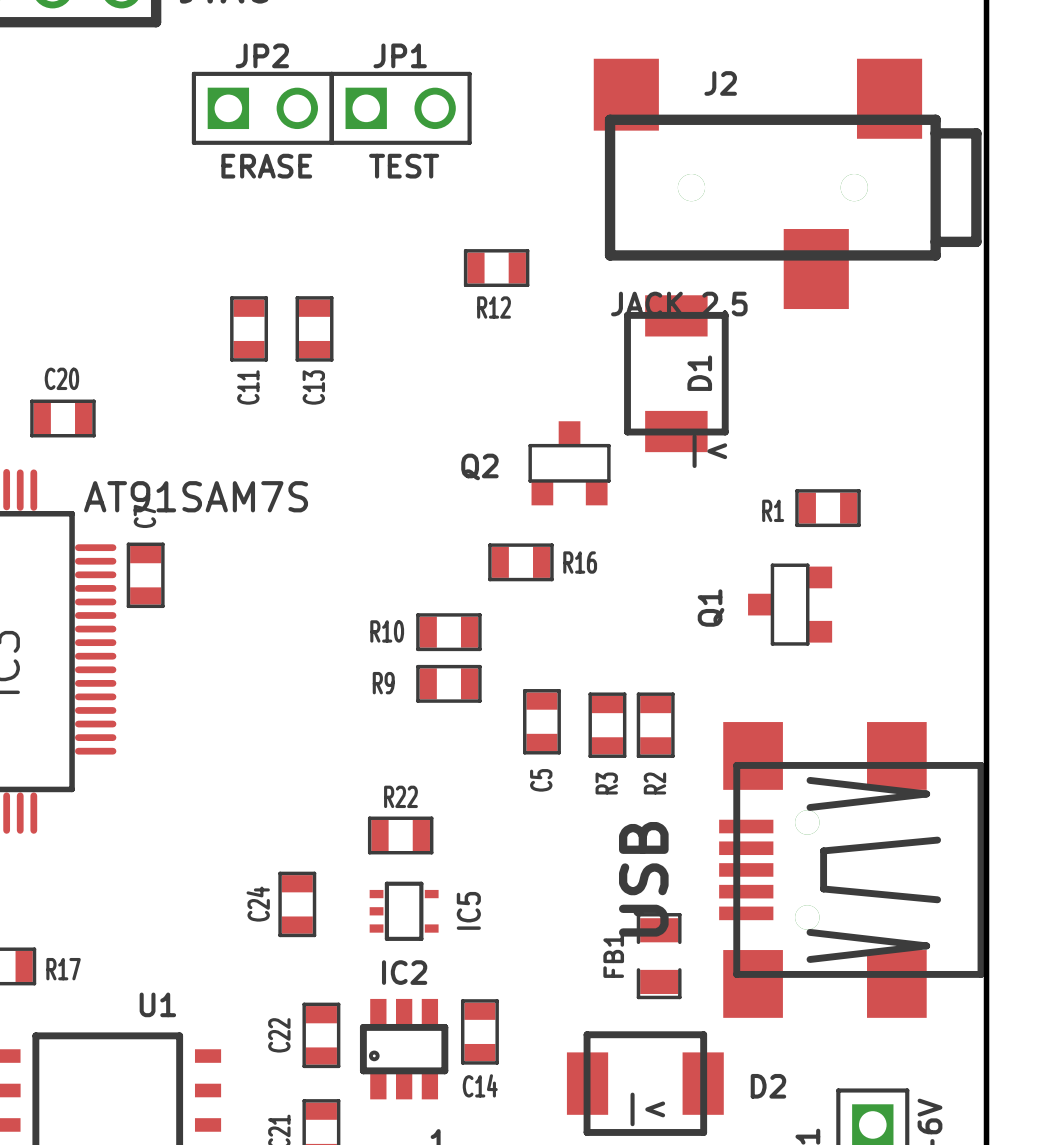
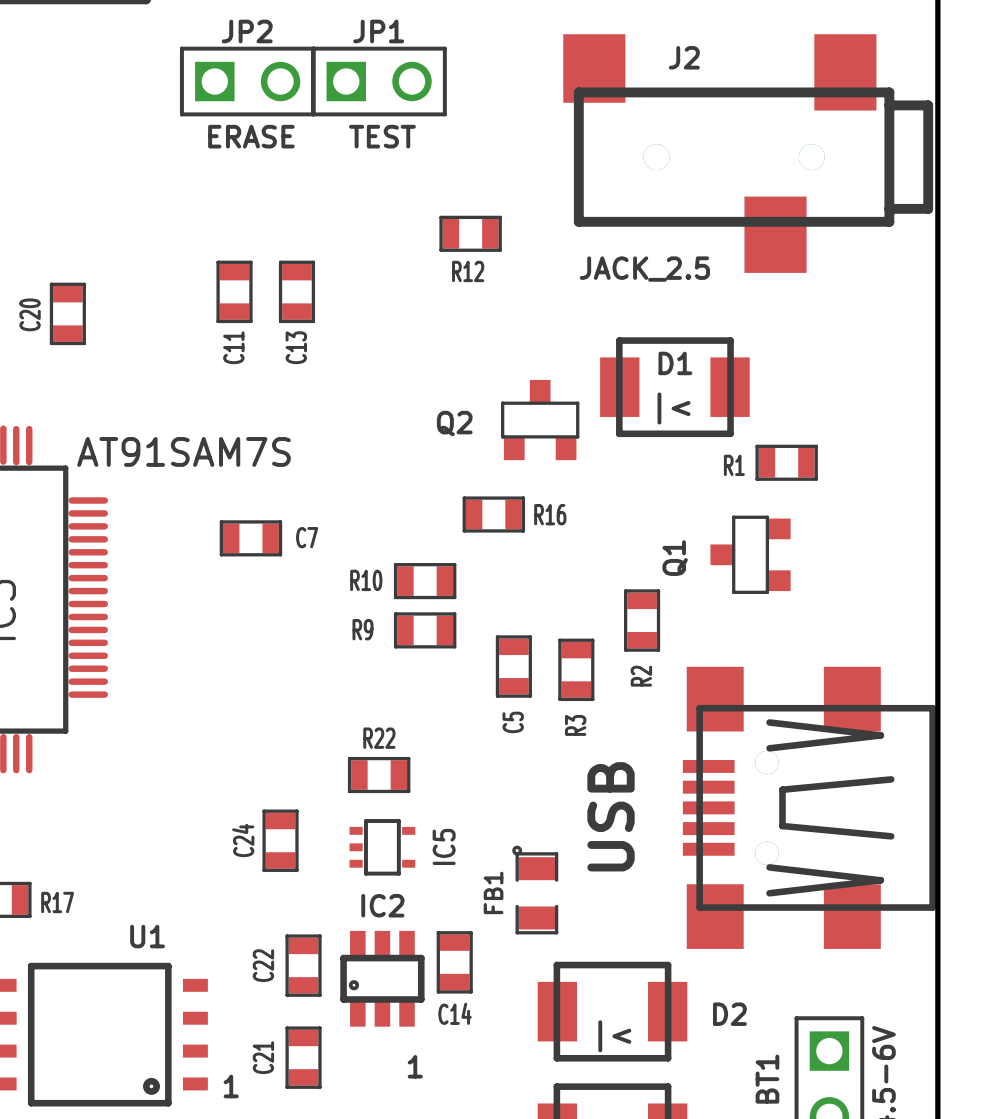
D1 rotation: 0° (676, 373) -> 90° clockwise (674, 387)
C20 name position: C20 (61, 378) -> C20 (30, 314)
C20 rotation: 0° (62, 418) -> 90° clockwise (67, 313)
C20 position: (62, 418) -> (67, 313)
C7 rotation: 0° (145, 575) -> 90° clockwise (250, 538)
C7 position: (145, 575) -> (250, 538)
R2 position: (655, 725) -> (642, 620)
FB1 position: (657, 952) -> (535, 890)

